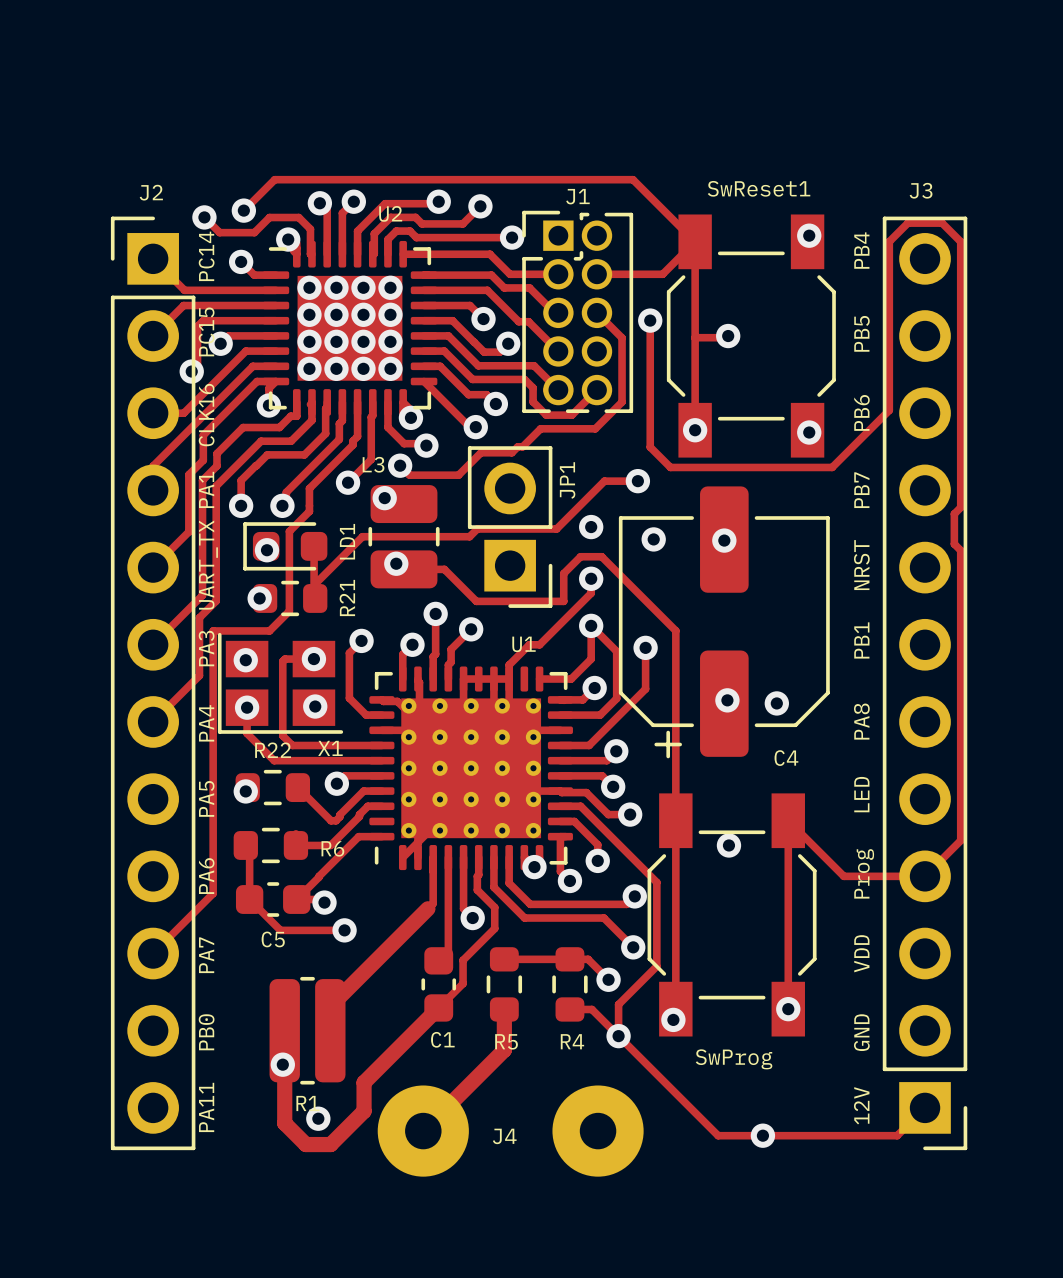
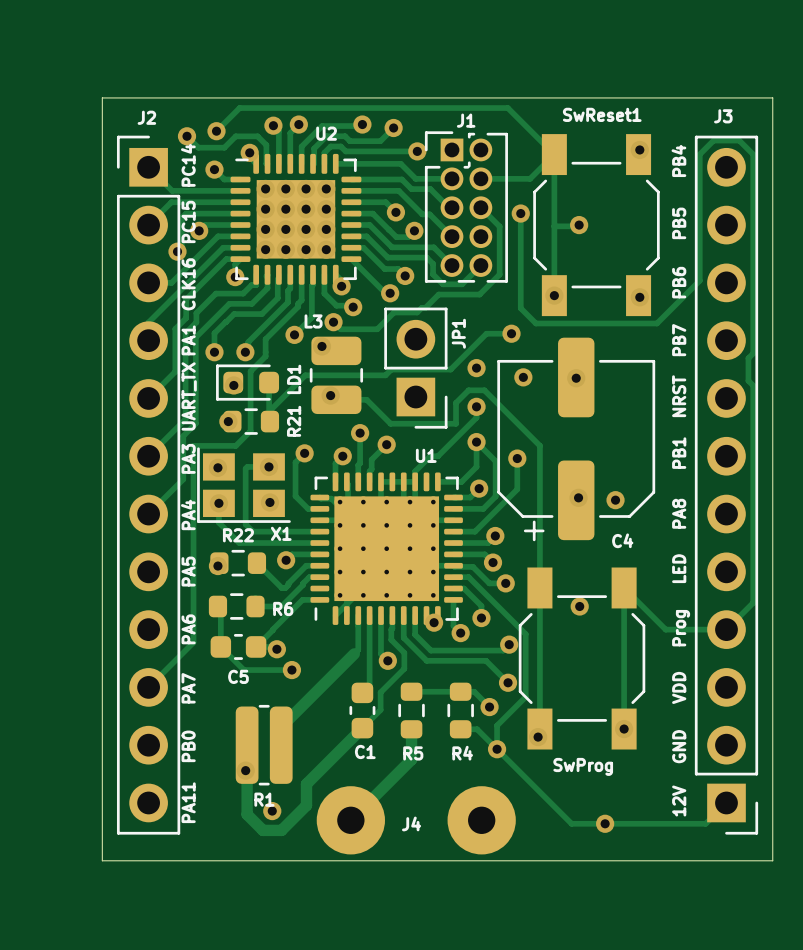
board edge: none -> (102, 97) (102, 860) (772, 860) (772, 97) (102, 97)

